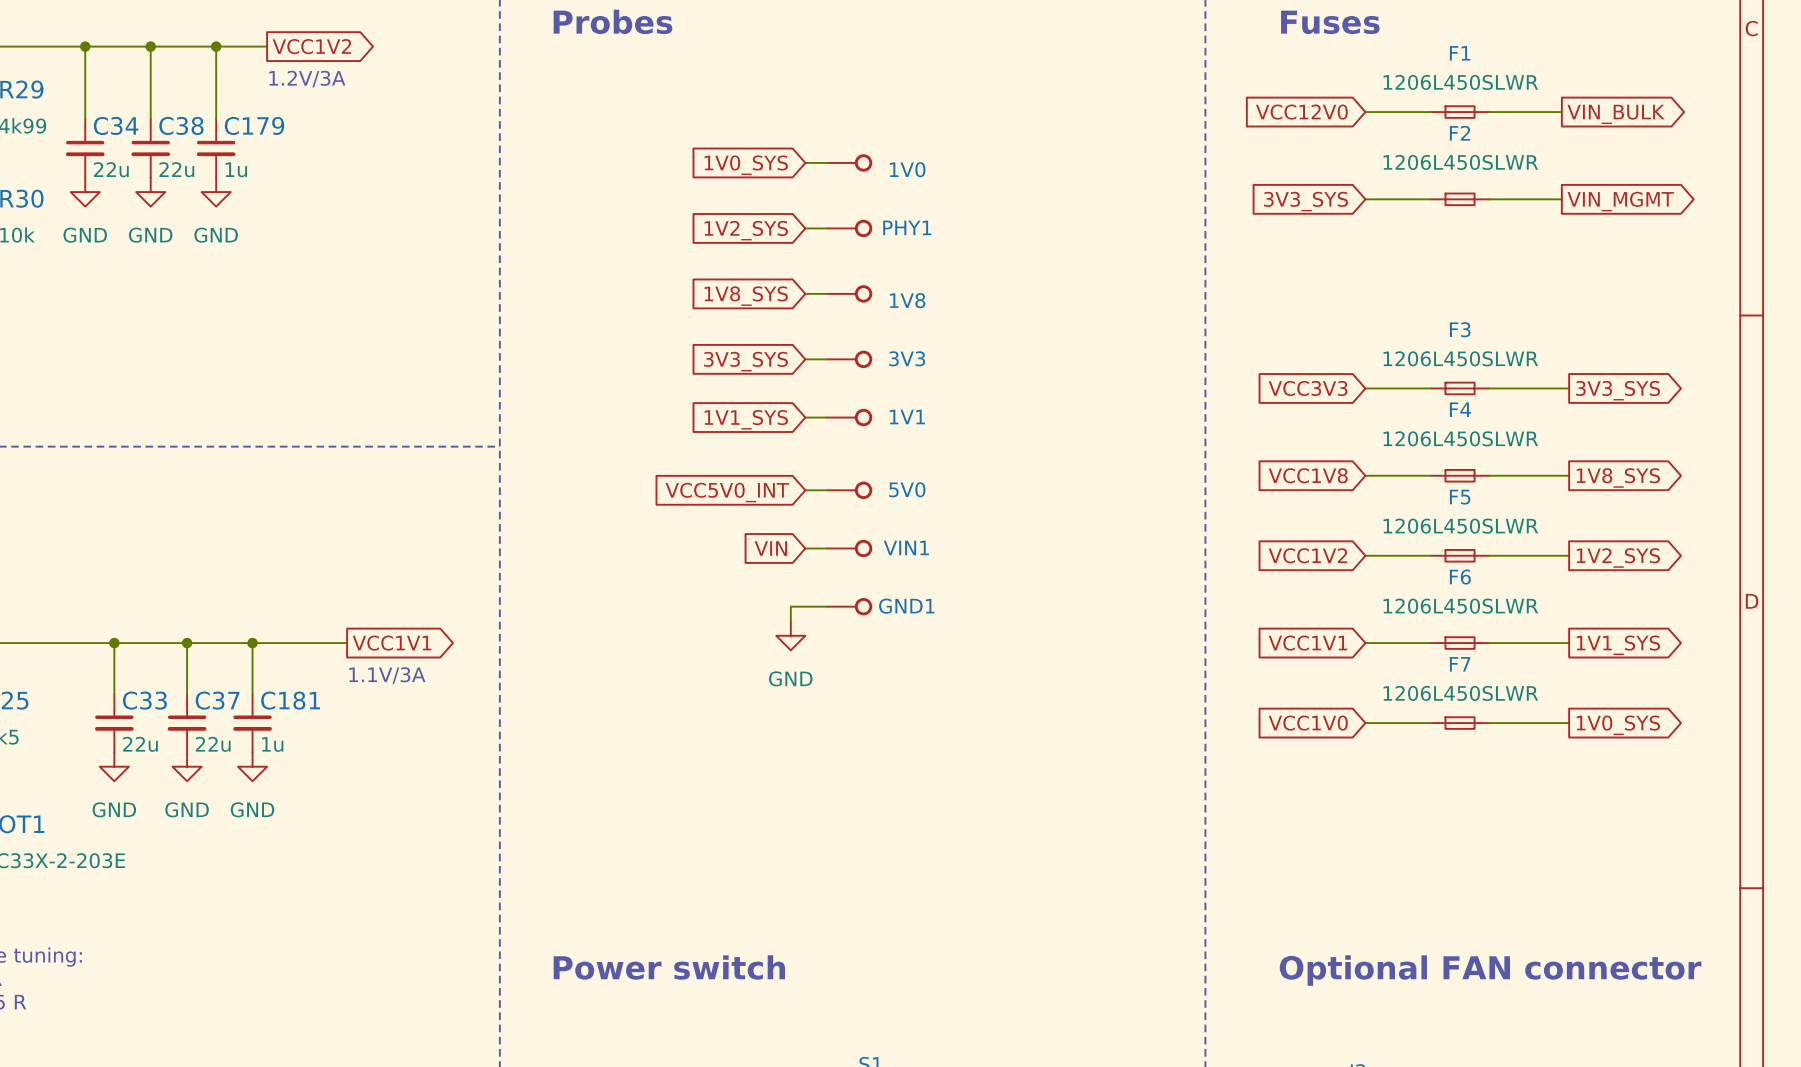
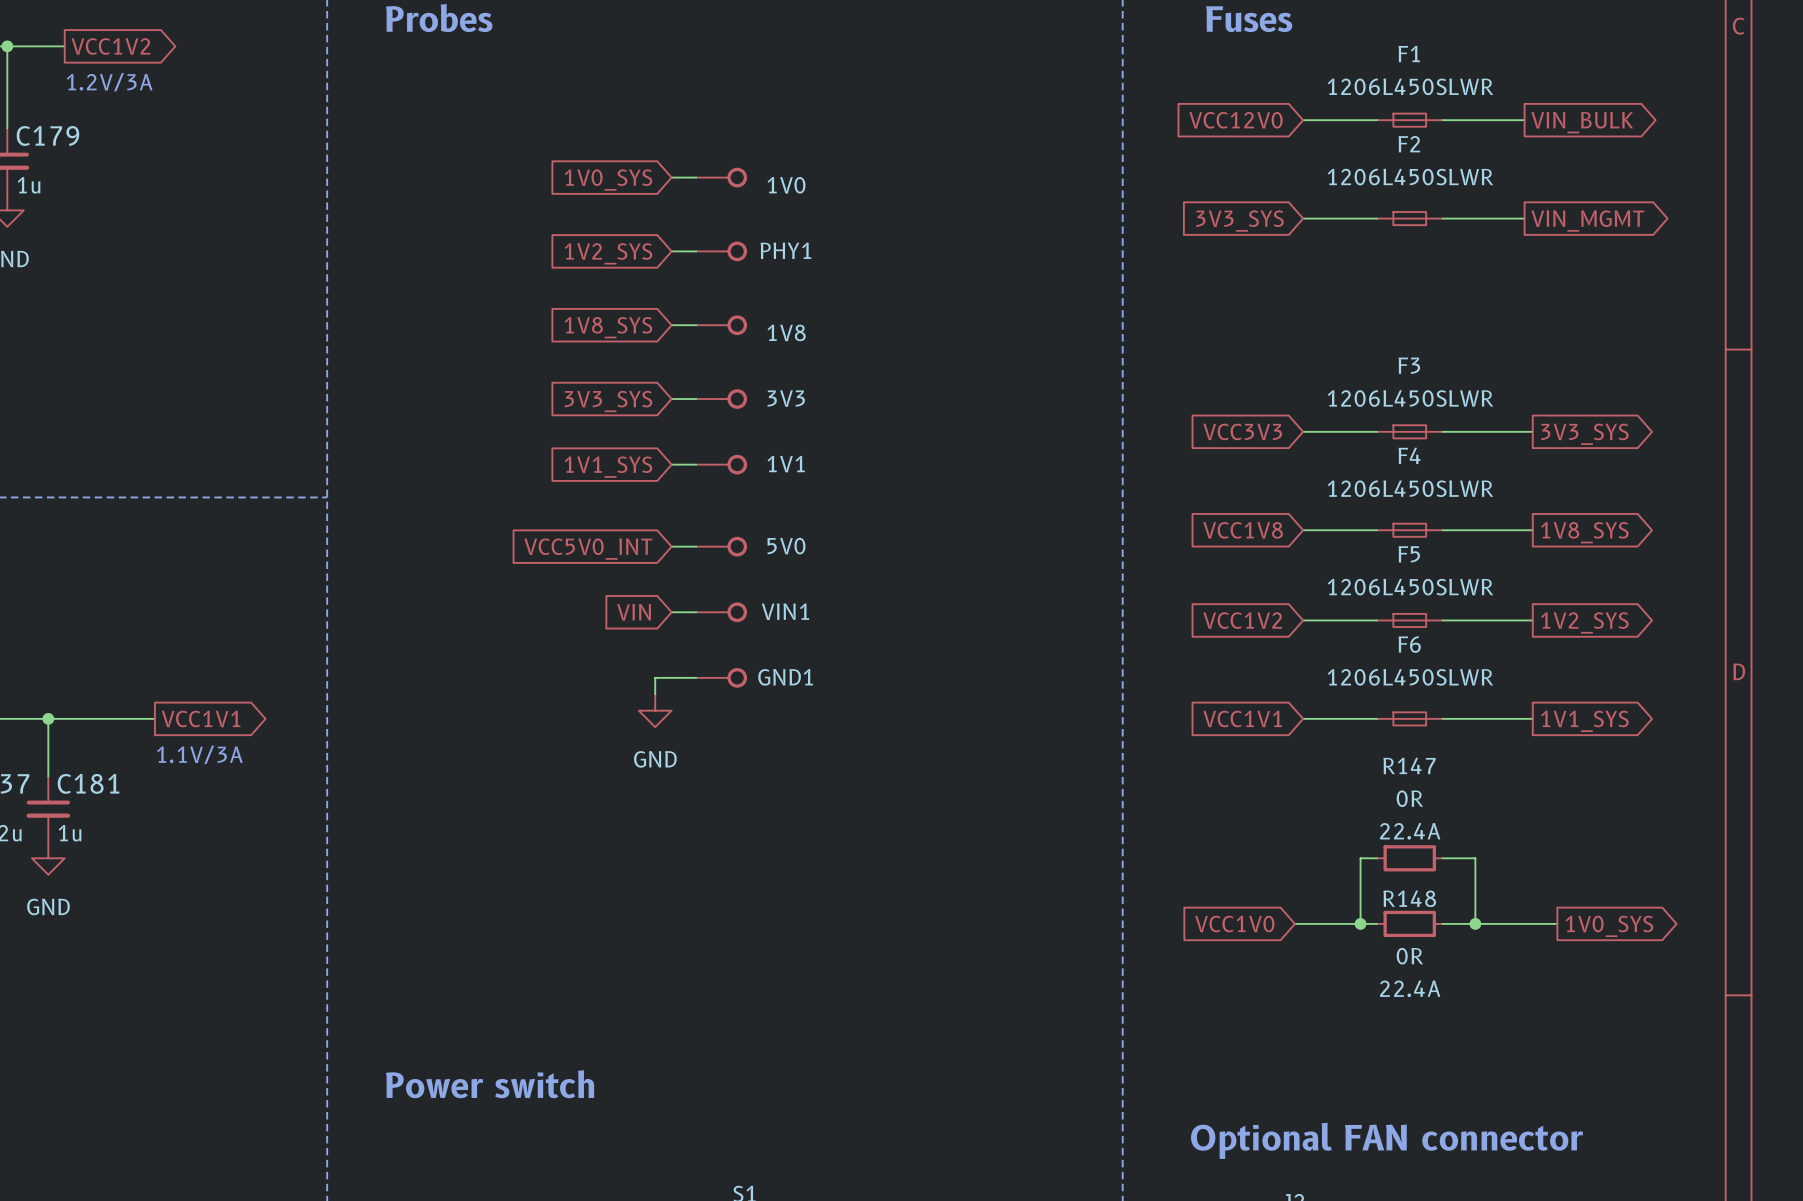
global label position: VCC1V0 (1308, 723) -> VCC1V0 (1234, 924)
wire: (1365, 723) (1430, 723) -> none
F7: (1460, 723) -> none
wire: (1489, 723) (1569, 723) -> none
global label position: 1V0_SYS (1618, 725) -> 1V0_SYS (1609, 926)
wire: none -> (1376, 858) (1360, 858) (1360, 923)
R147: none -> (1409, 858)
wire: none -> (1442, 858) (1475, 858) (1475, 923)
wire: none -> (1294, 923) (1376, 923)
junction: none -> (1360, 923)
R148: none -> (1409, 923)
wire: none -> (1442, 923) (1557, 923)
junction: none -> (1475, 923)
text position: Optional FAN connector (1490, 970) -> Optional FAN connector (1386, 1140)

